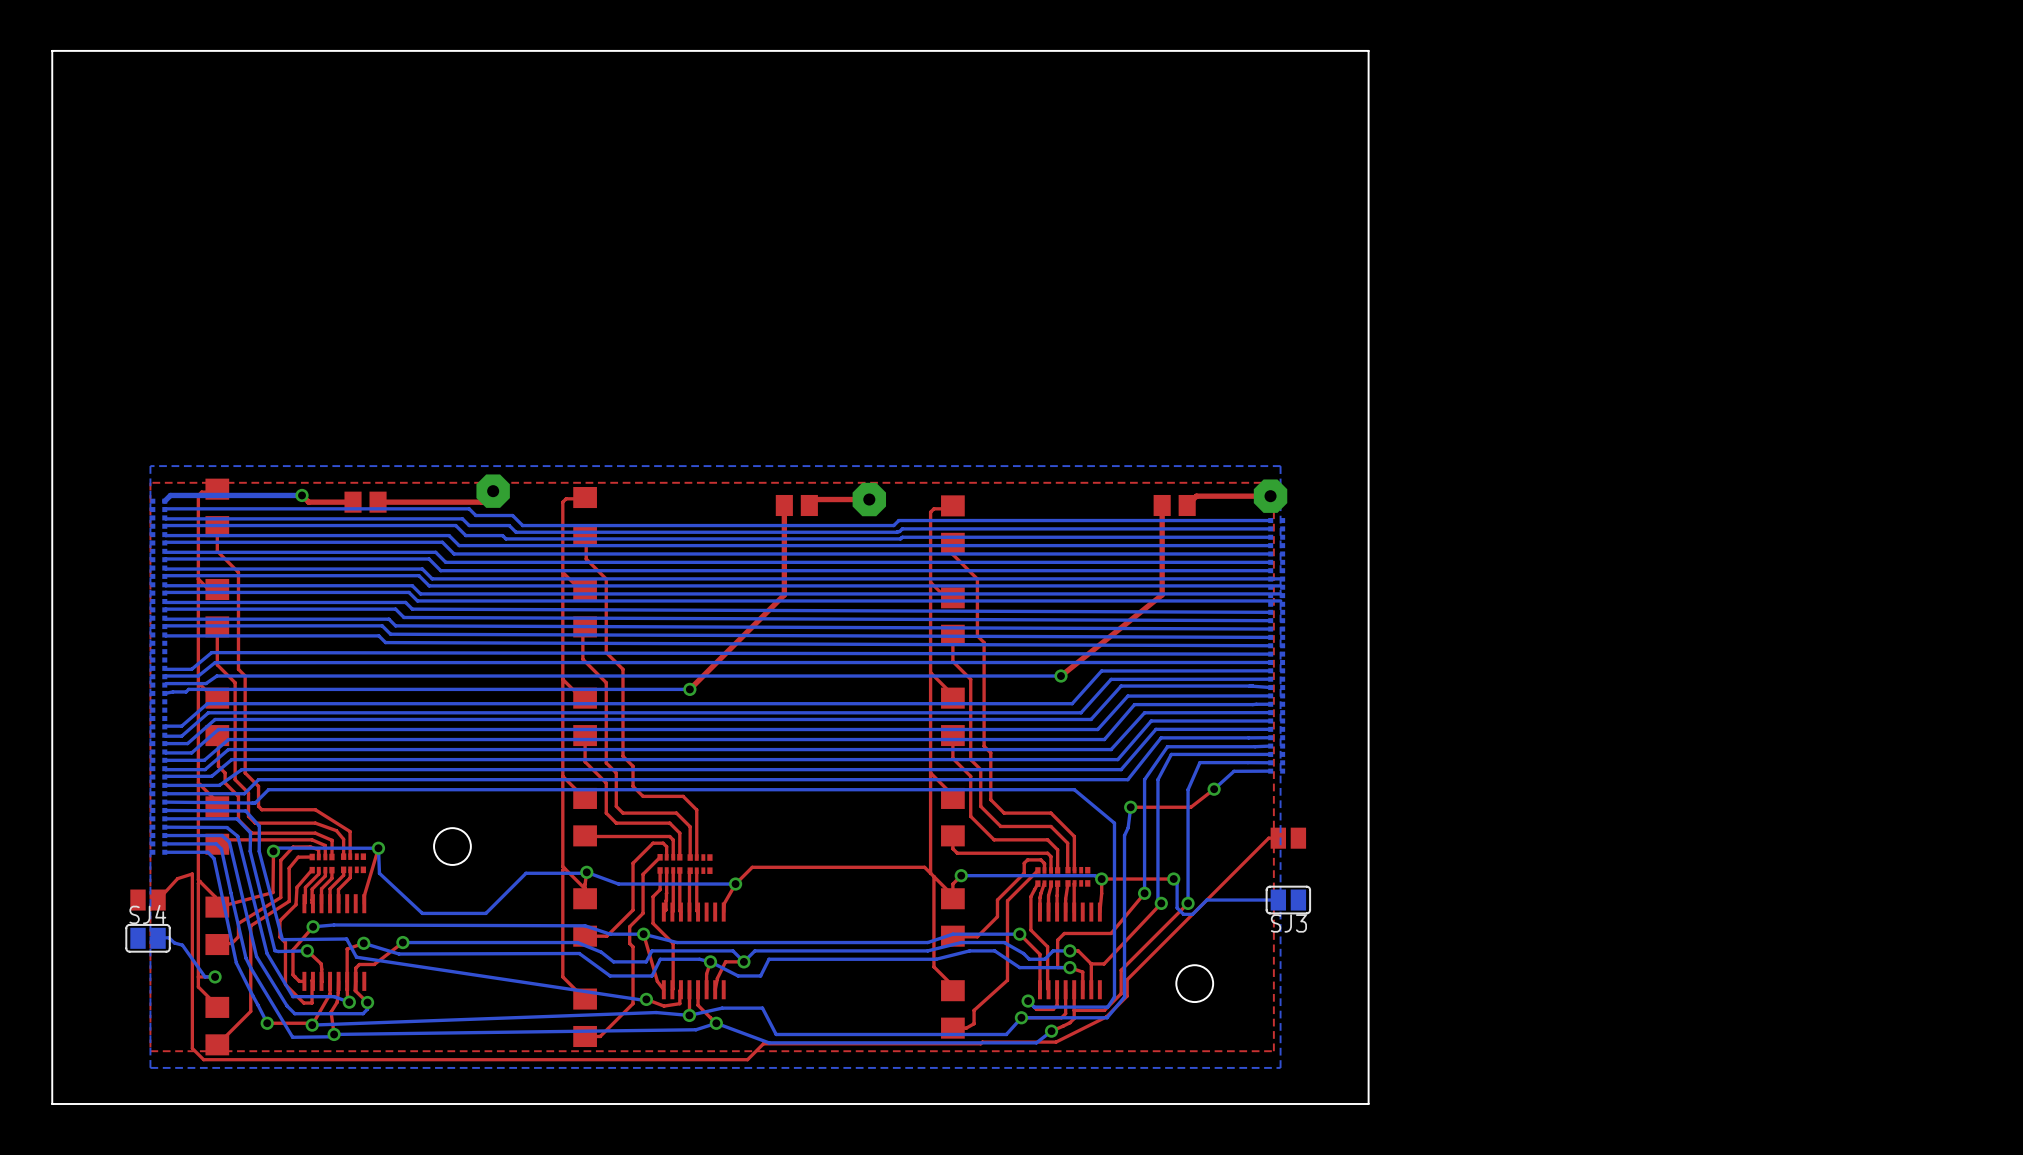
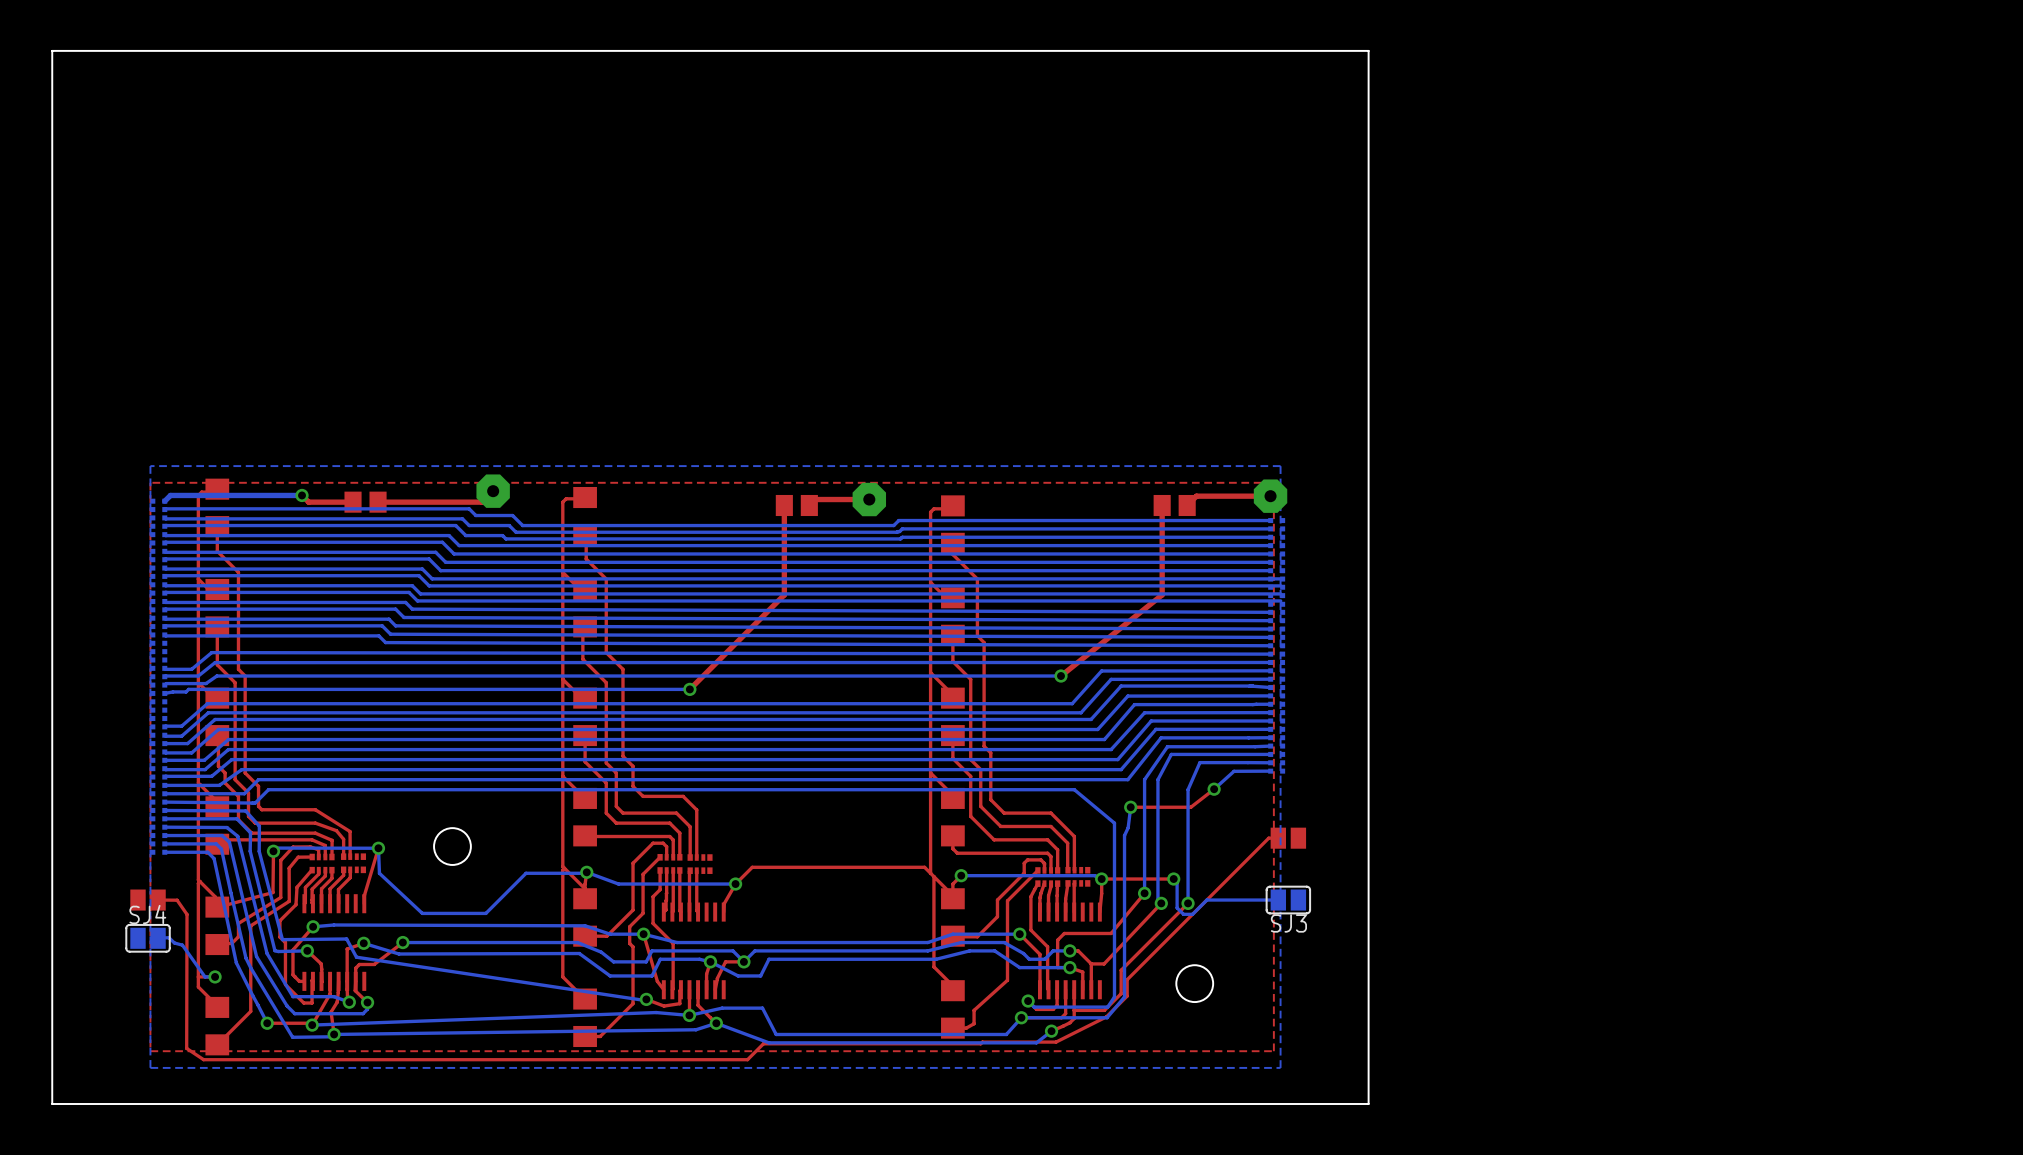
top track: (158, 900) (177, 878) (192, 873) (192, 1048) (203, 1059) -> (158, 900) (177, 900) (187, 914) (186, 1048) (203, 1059)

